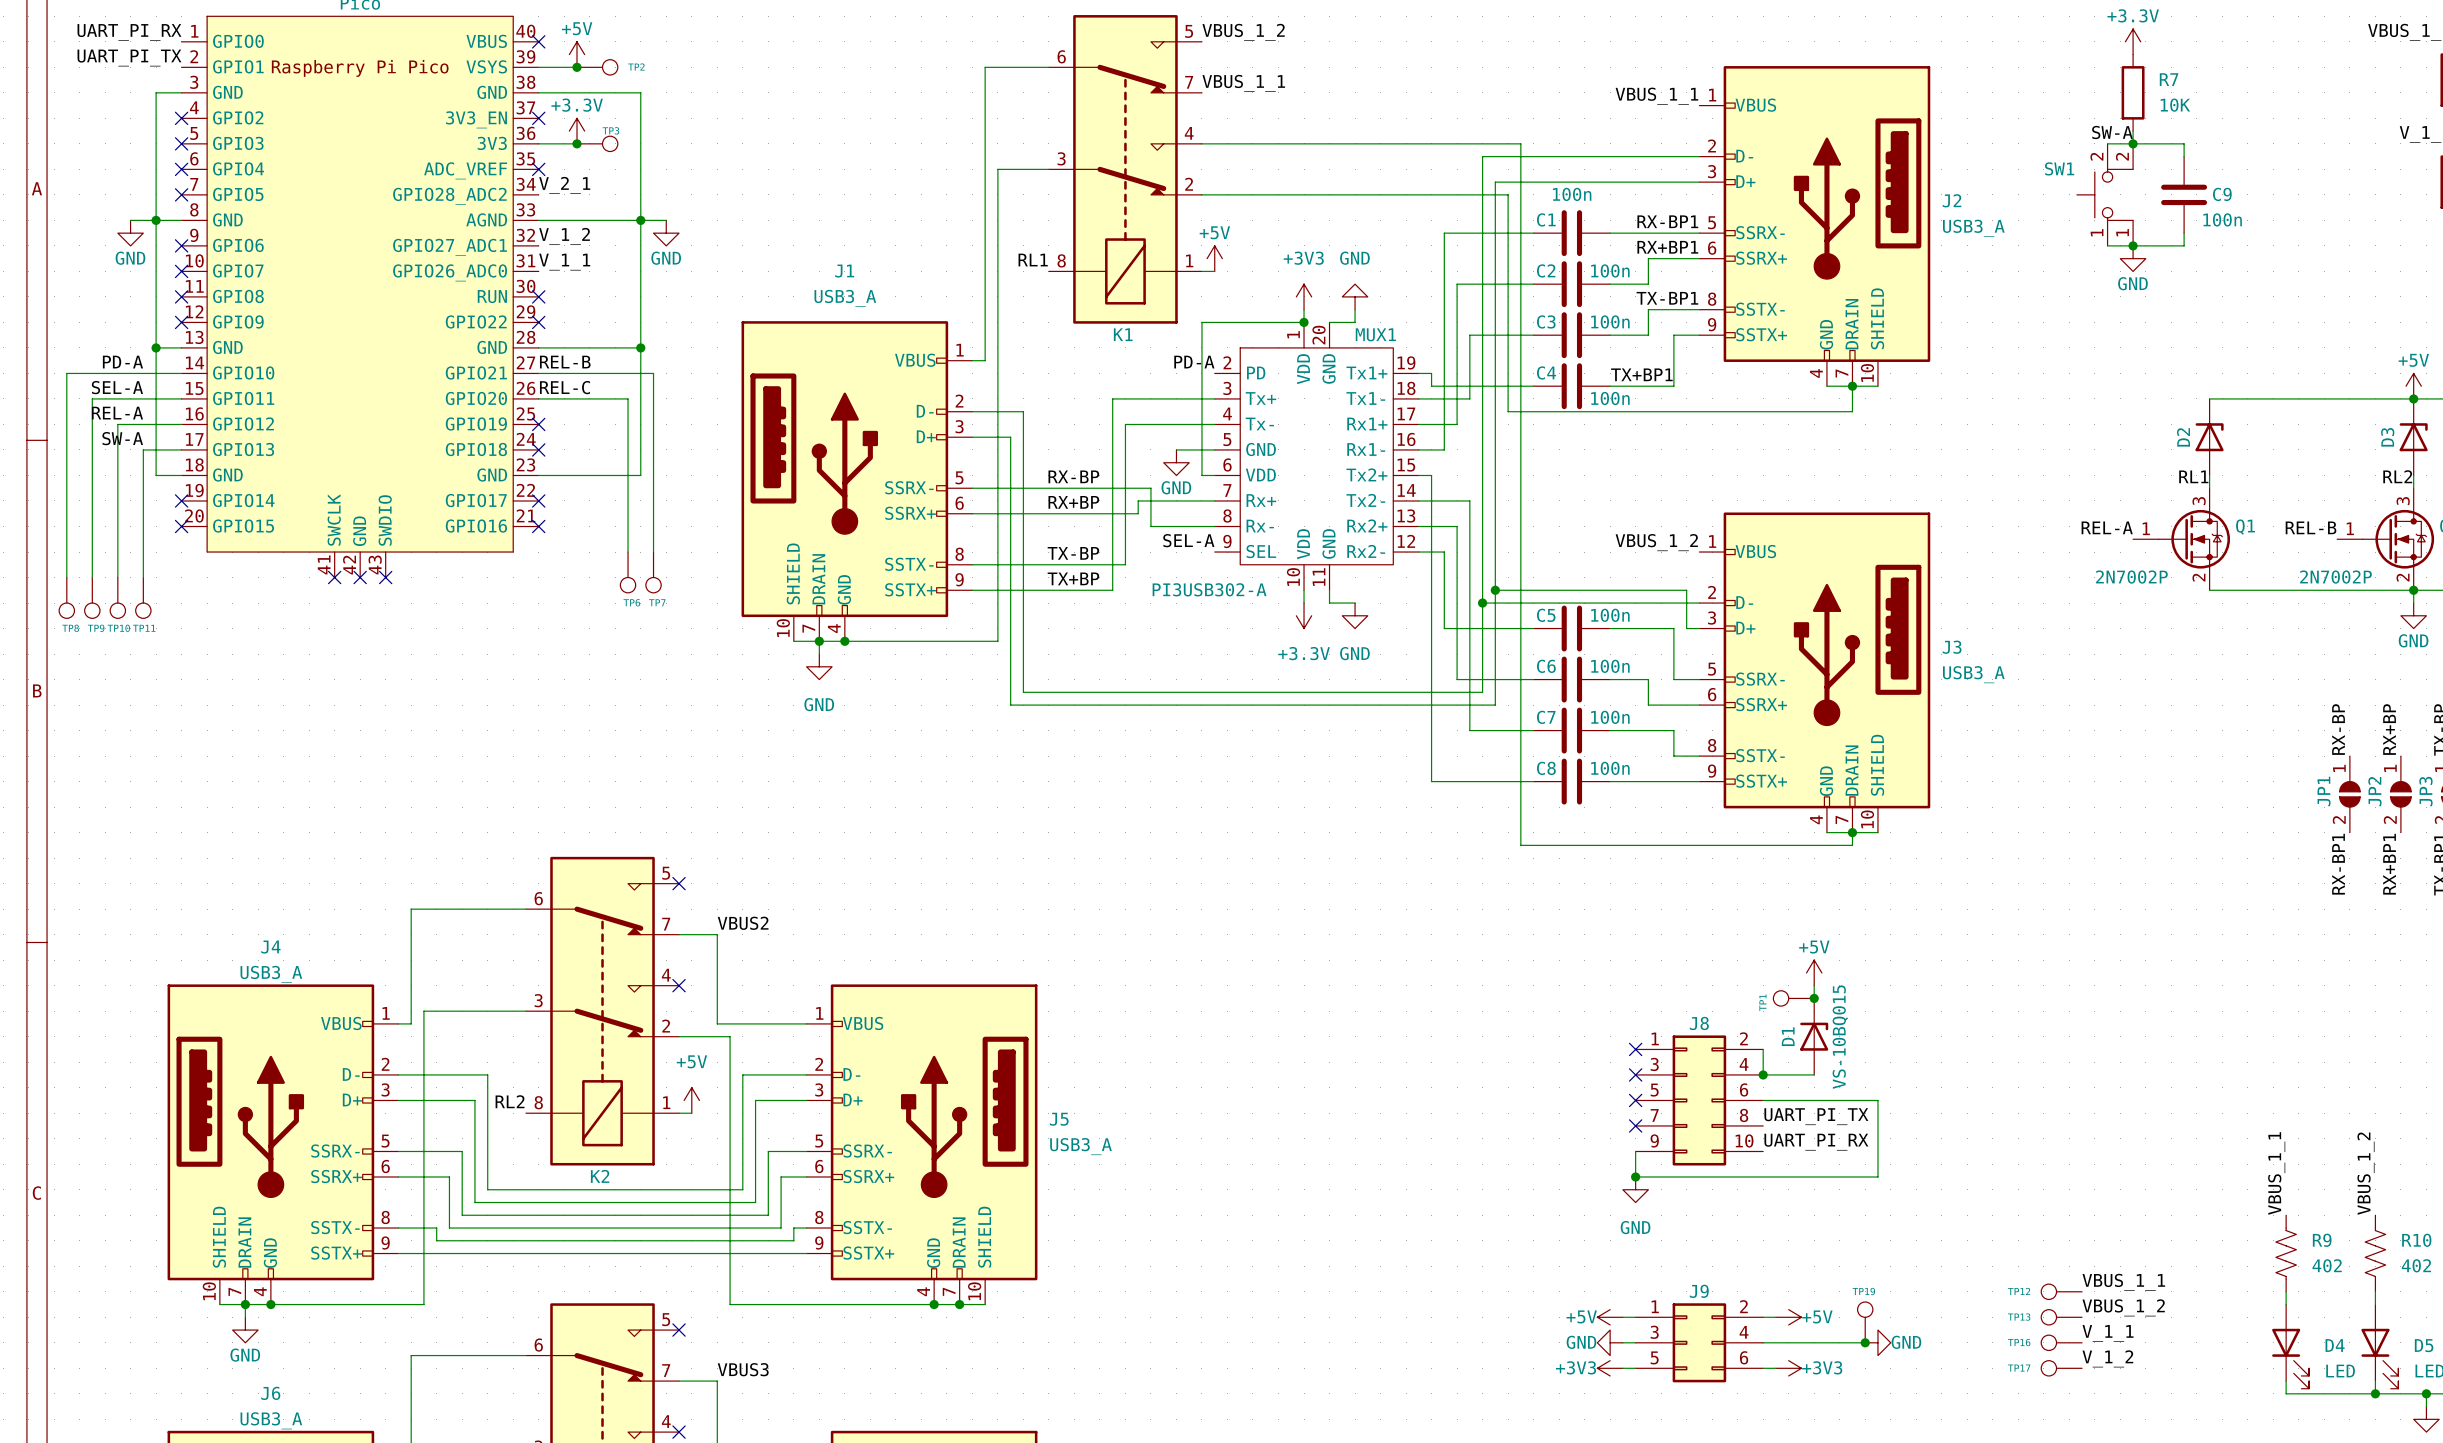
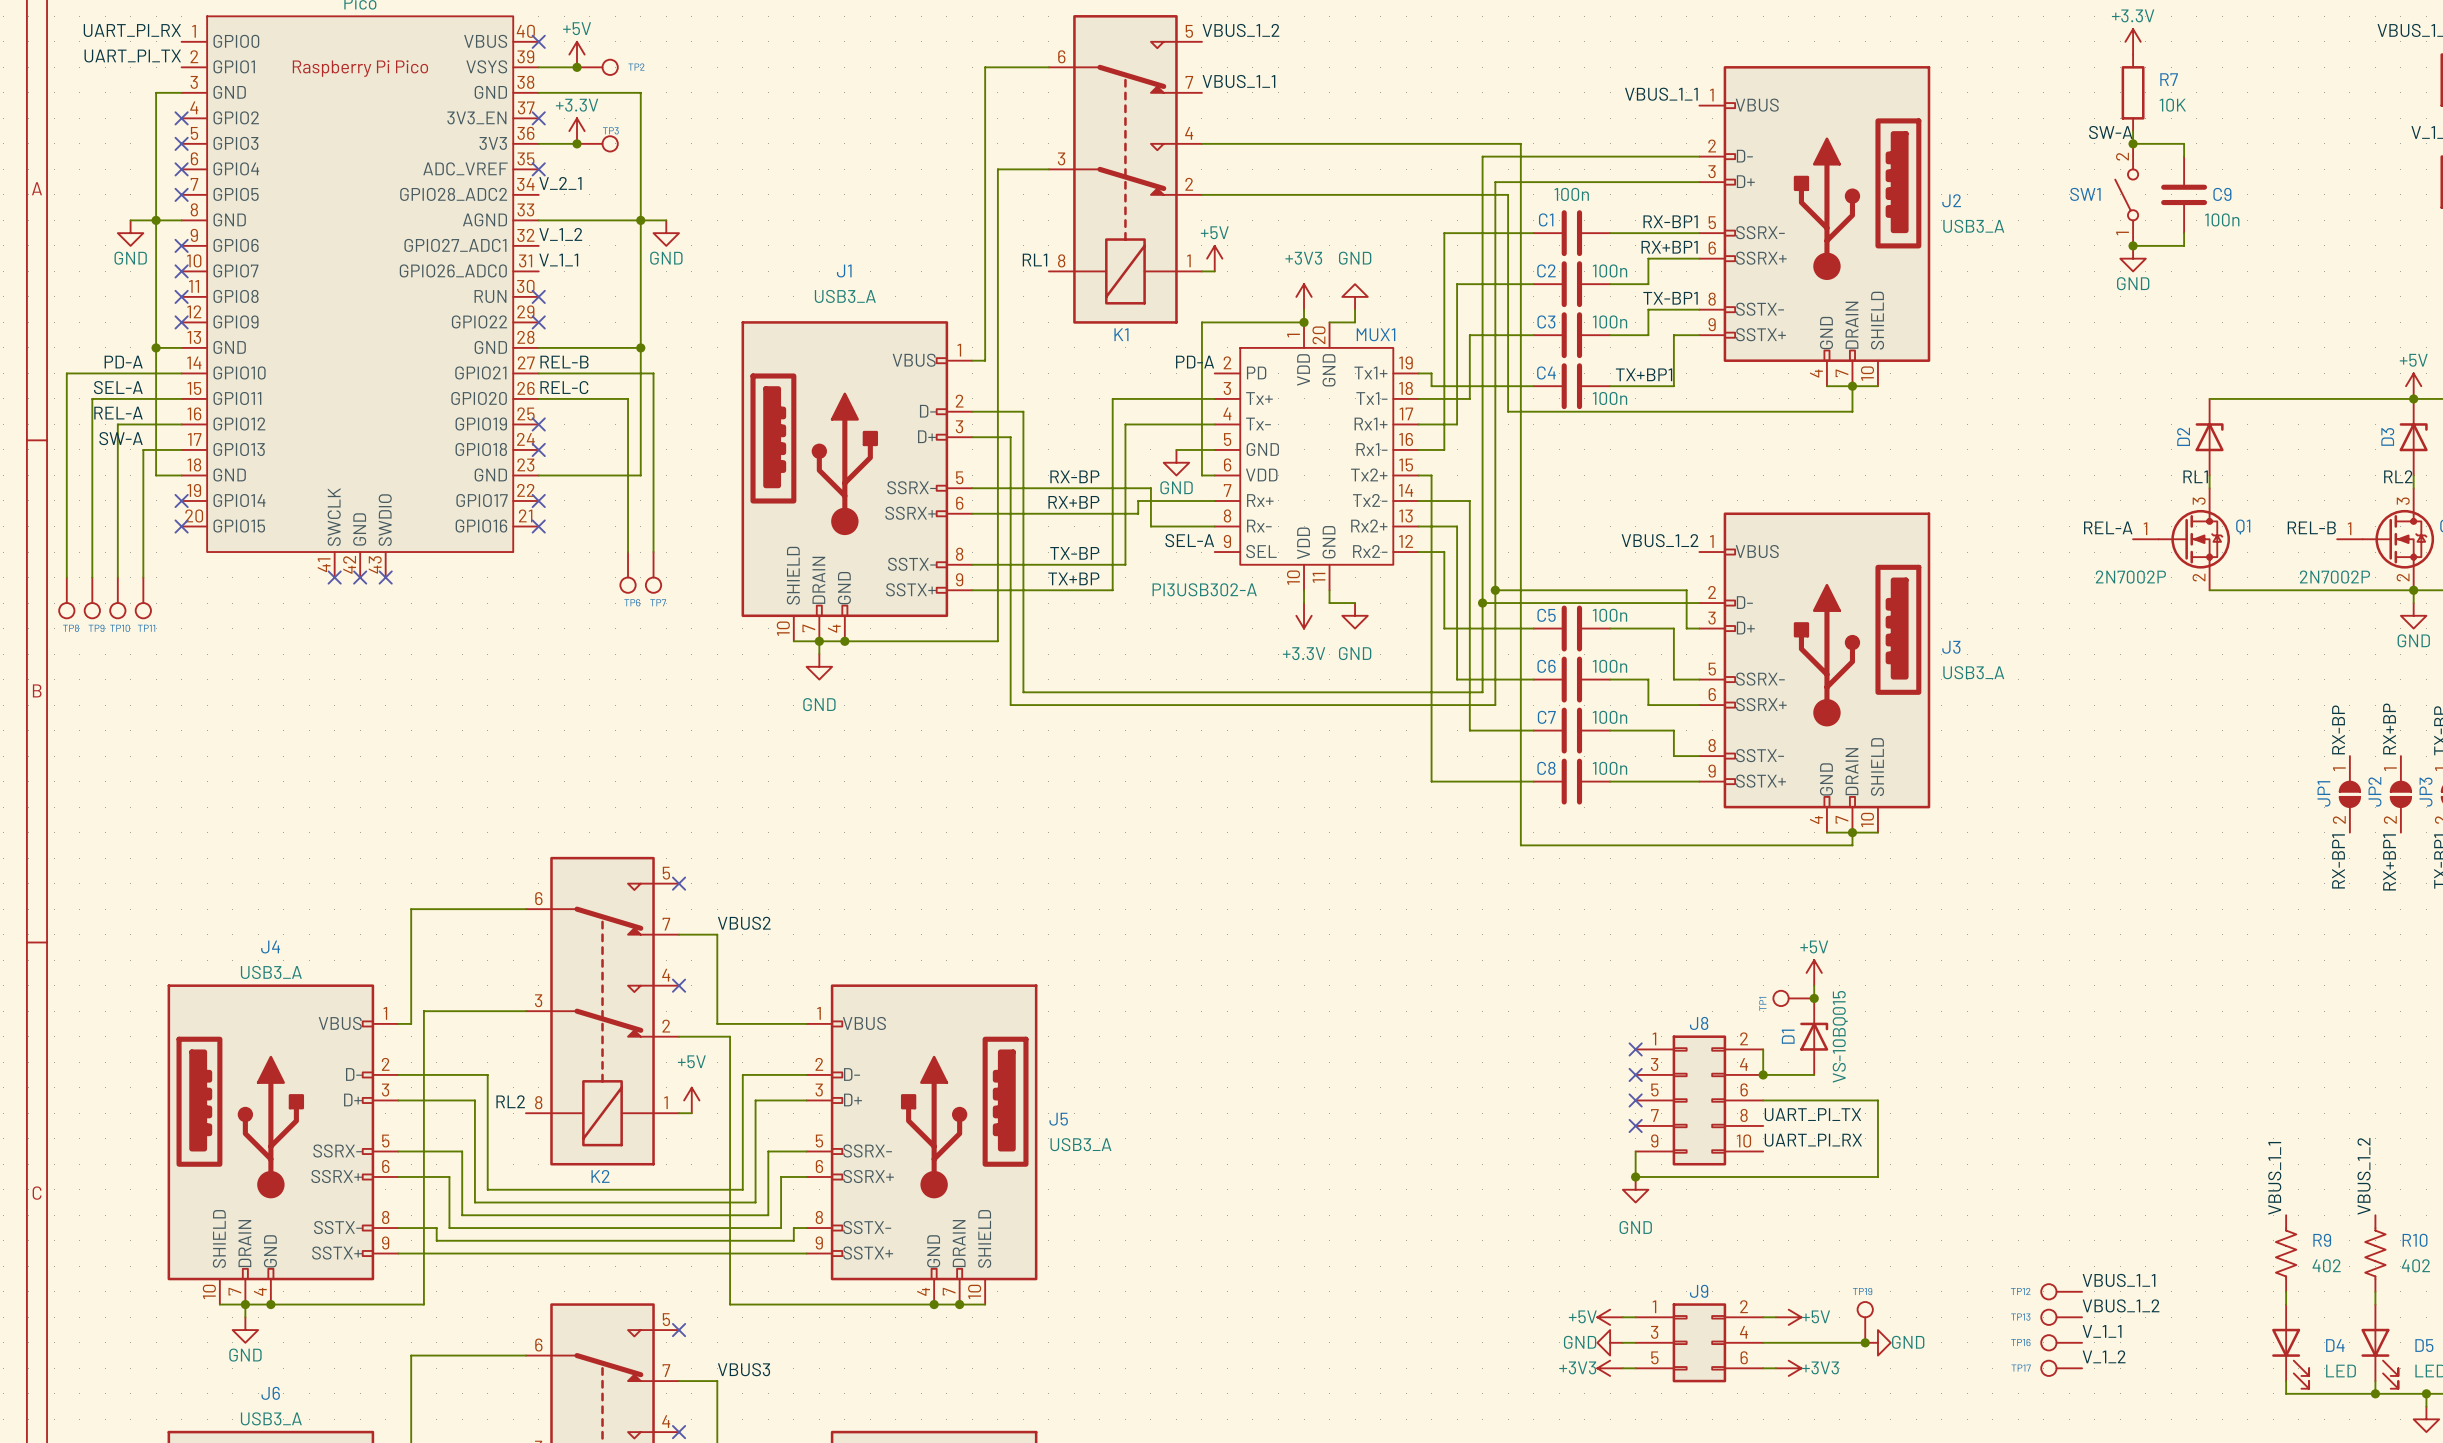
SW1 symbol: [2076, 143, 2134, 246] -> [2115, 143, 2139, 246]
wire: (2107, 143) (2133, 143) -> none
SW1 name position: SW1 (2059, 168) -> SW1 (2085, 194)
wire: (2107, 245) (2133, 245) -> none

